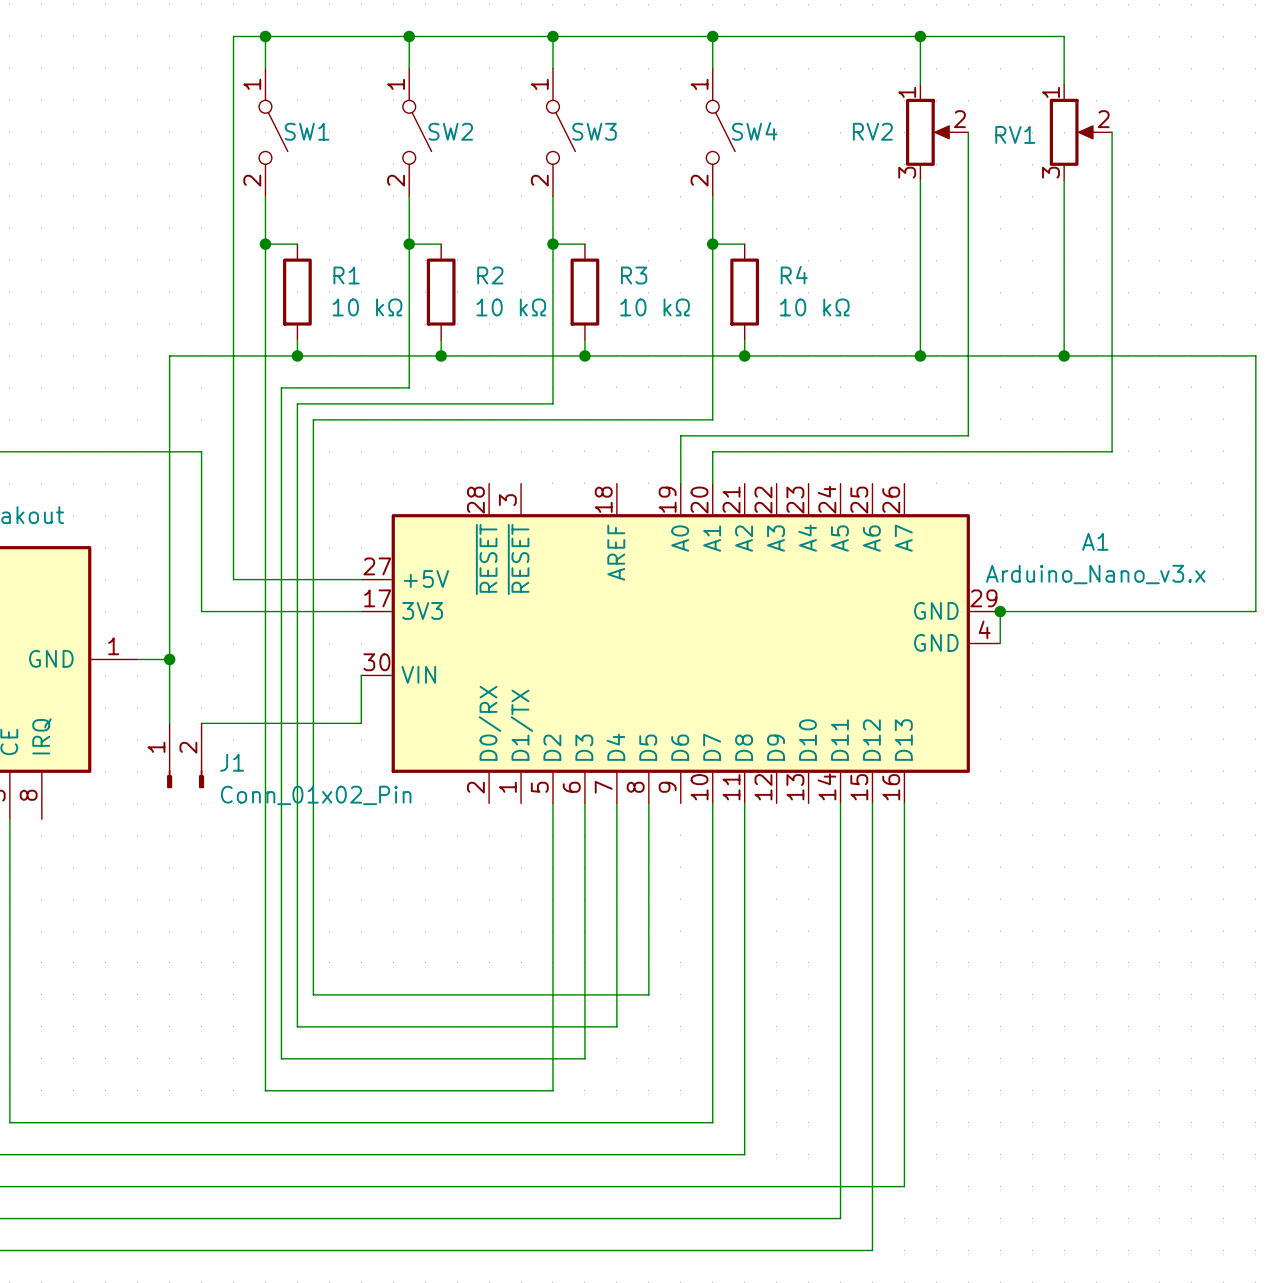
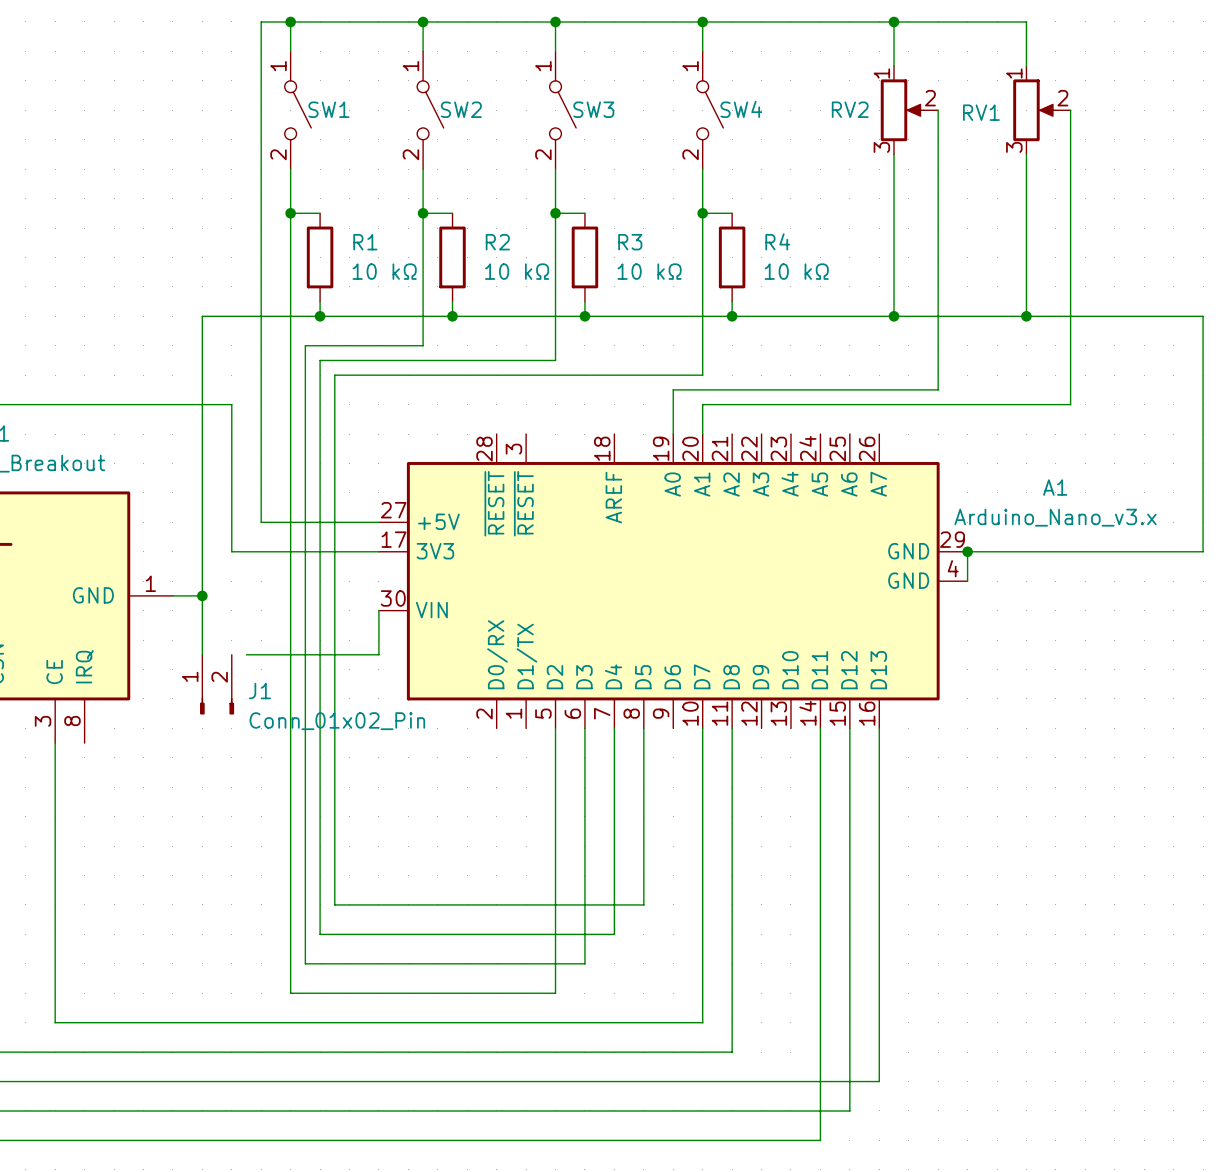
wire: (201, 723) (217, 723) -> none
wire: (872, 1218) (872, 1250) (840, 1250) -> (849, 1110) (820, 1110) (820, 1140)

